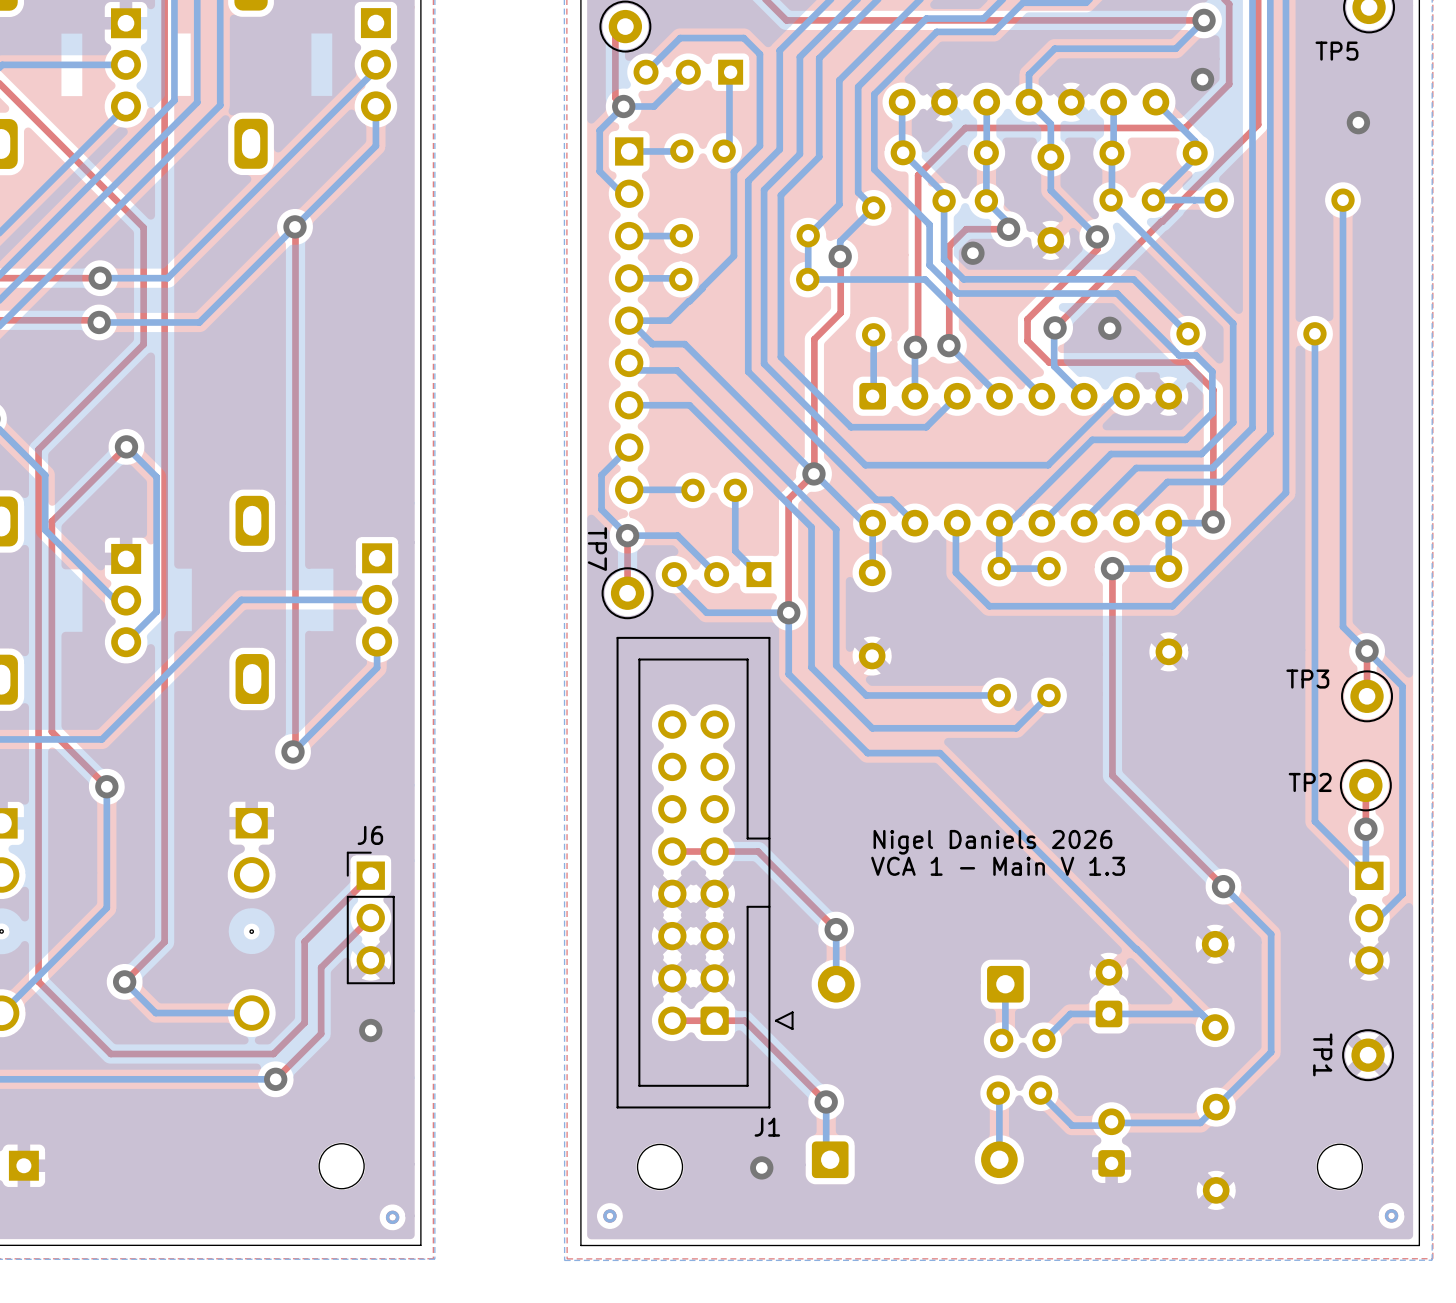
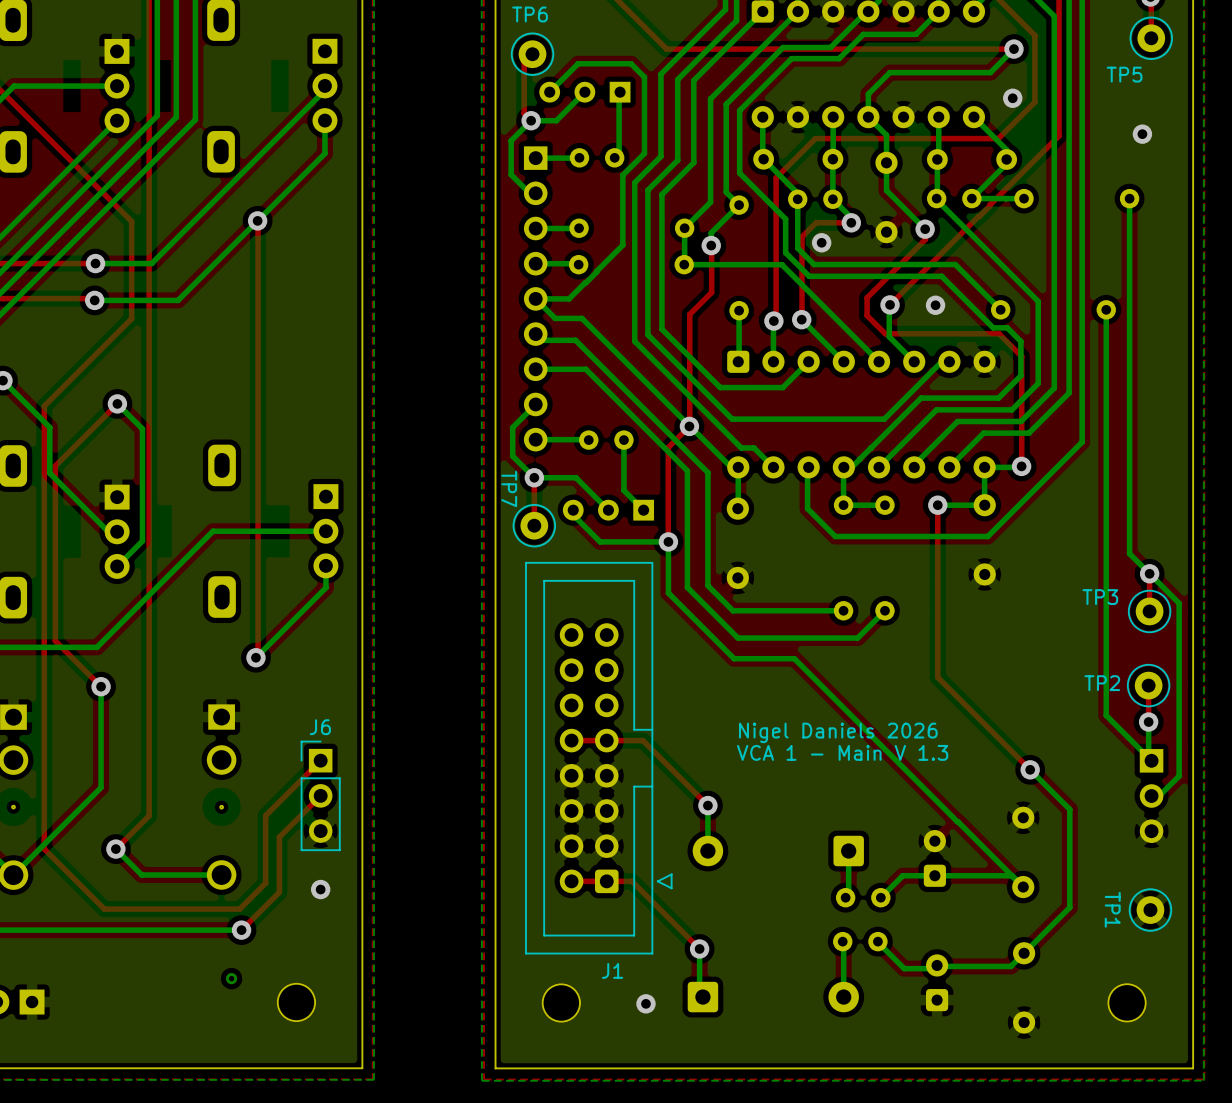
J1 name position: J1 (767, 1127) -> J1 (612, 970)
drawing: [603, 1209, 617, 1223] -> none
drawing: [1384, 1209, 1399, 1223] -> none
drawing position: (392, 1217) -> (231, 978)

